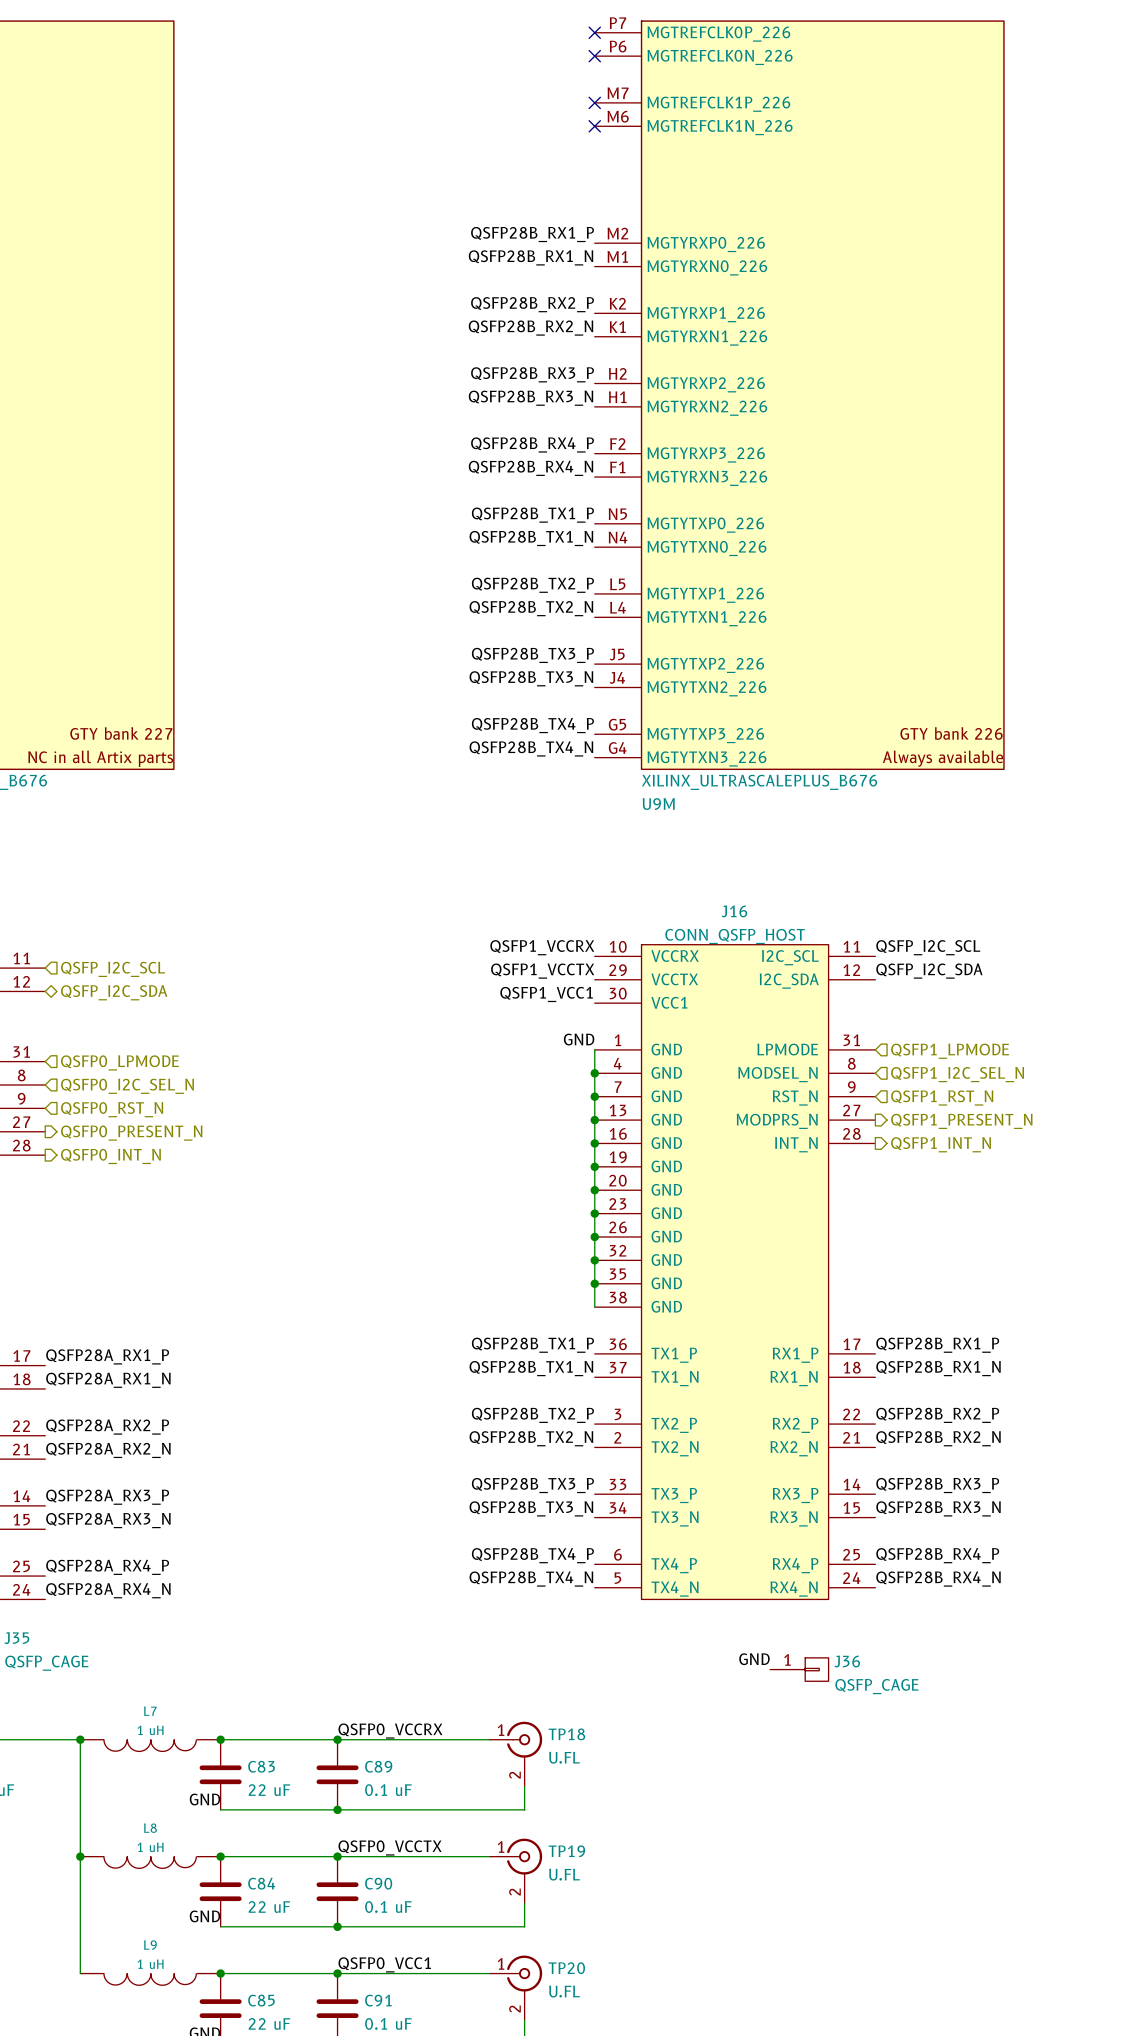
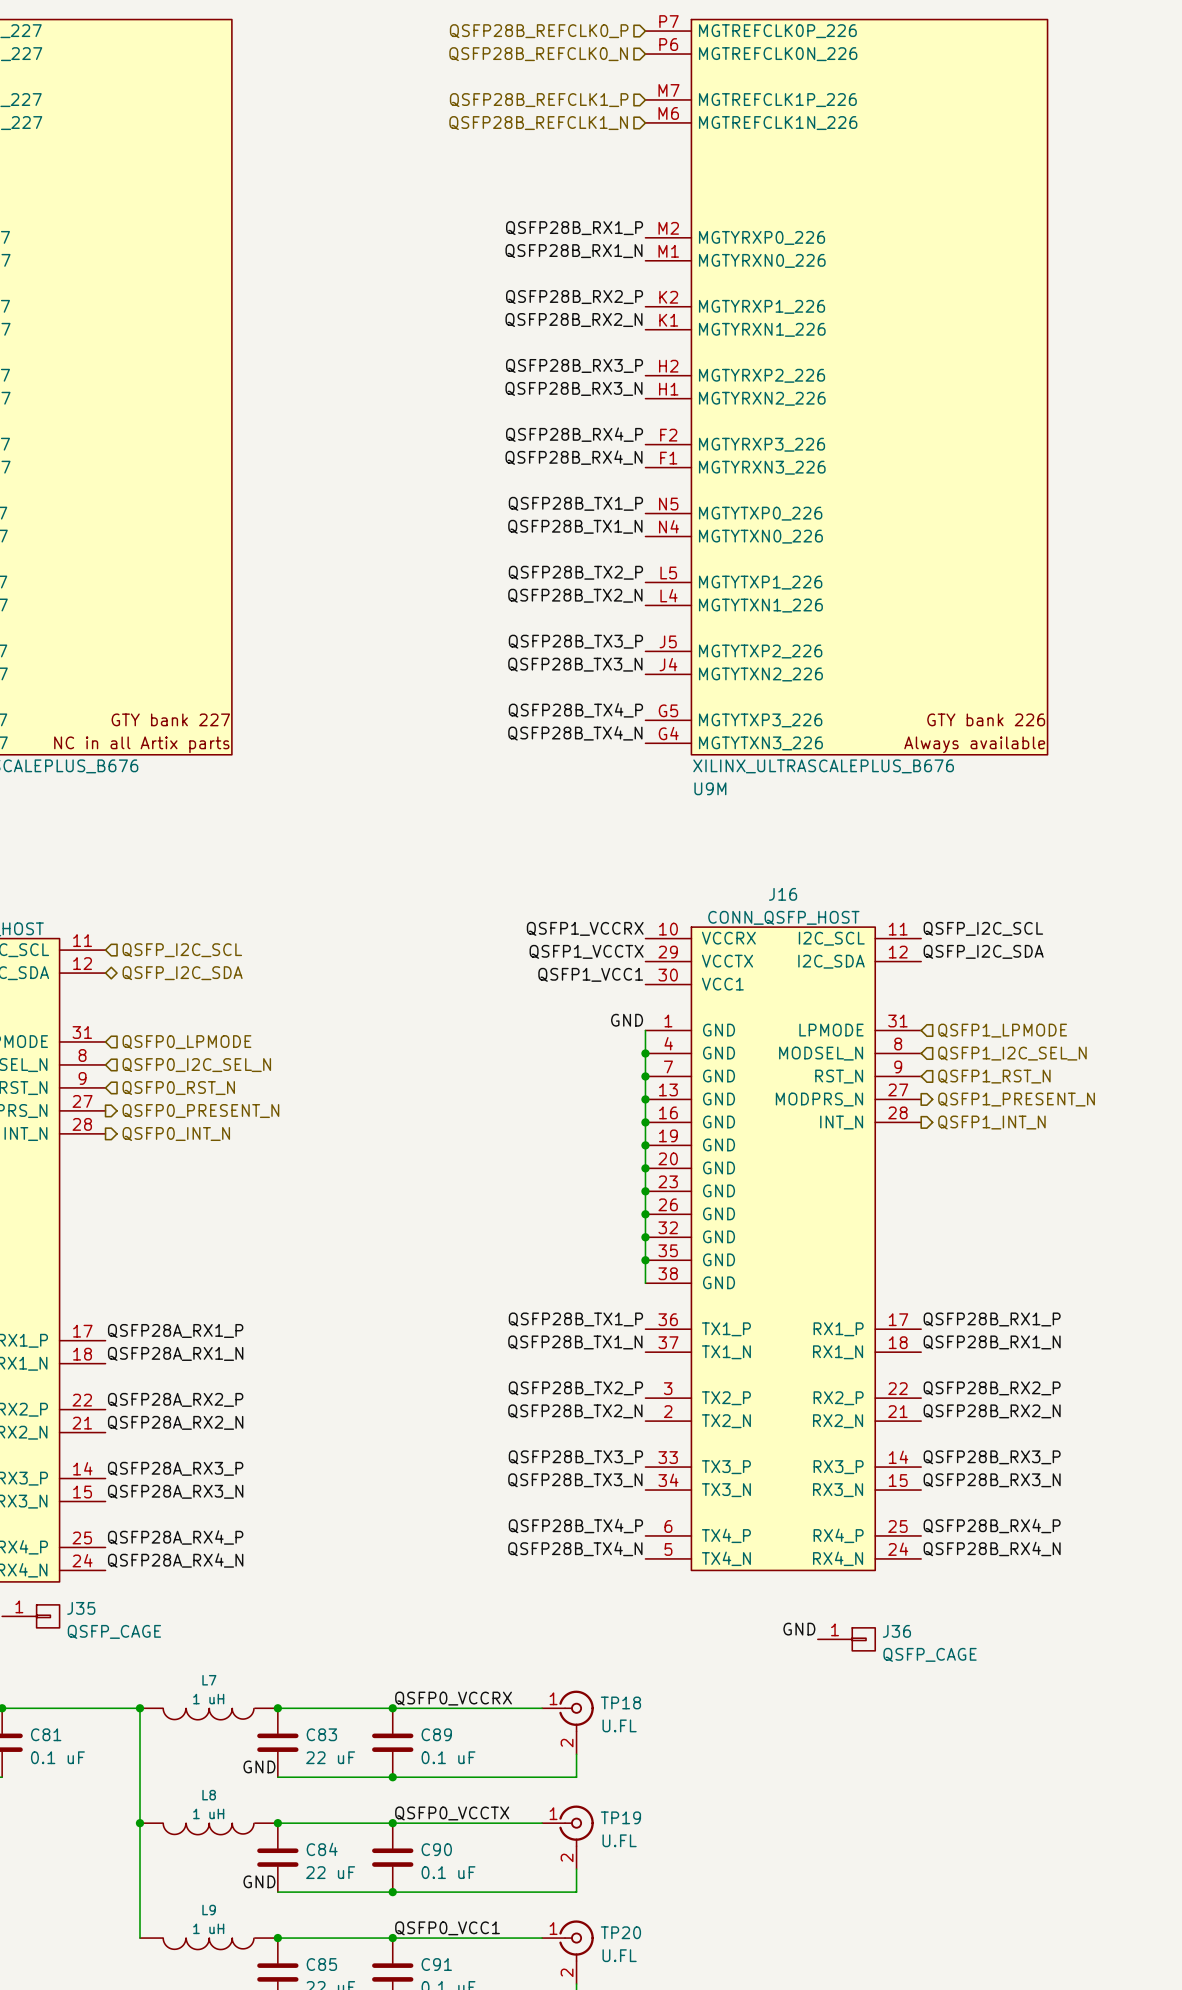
no-connect mark: (594, 32) -> none
hierarchical label: none -> QSFP28B_REFCLK0_P (539, 31)
no-connect mark: (594, 56) -> none
hierarchical label: none -> QSFP28B_REFCLK0_N (538, 54)
no-connect mark: (594, 102) -> none
hierarchical label: none -> QSFP28B_REFCLK1_P (539, 100)
no-connect mark: (594, 126) -> none
hierarchical label: none -> QSFP28B_REFCLK1_N (538, 123)

